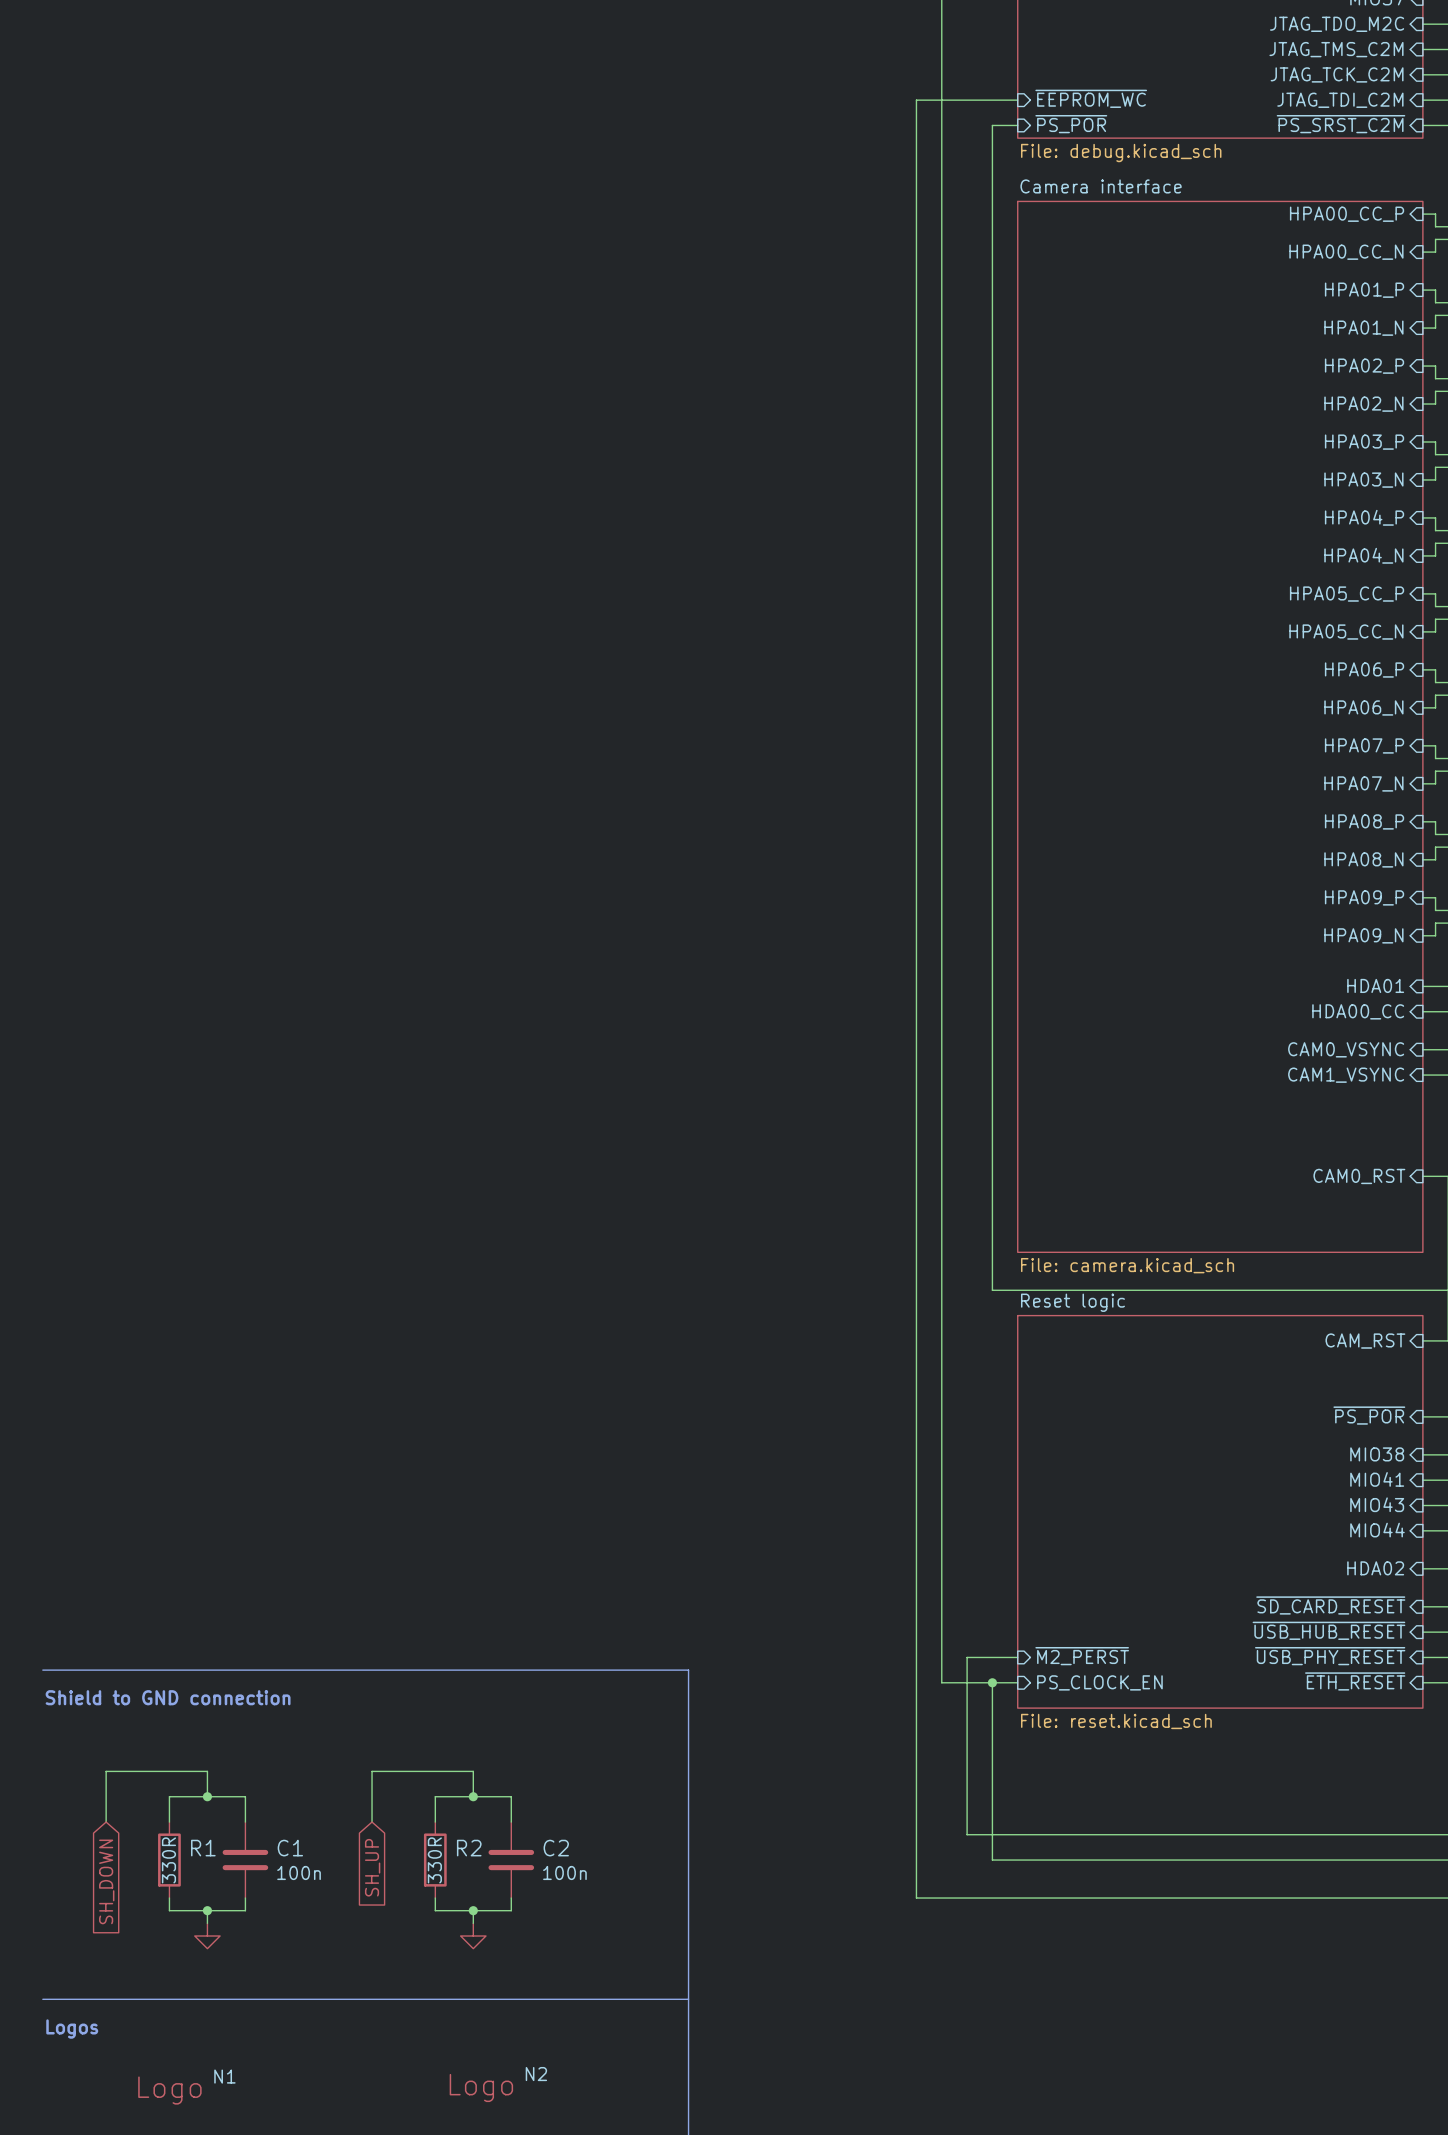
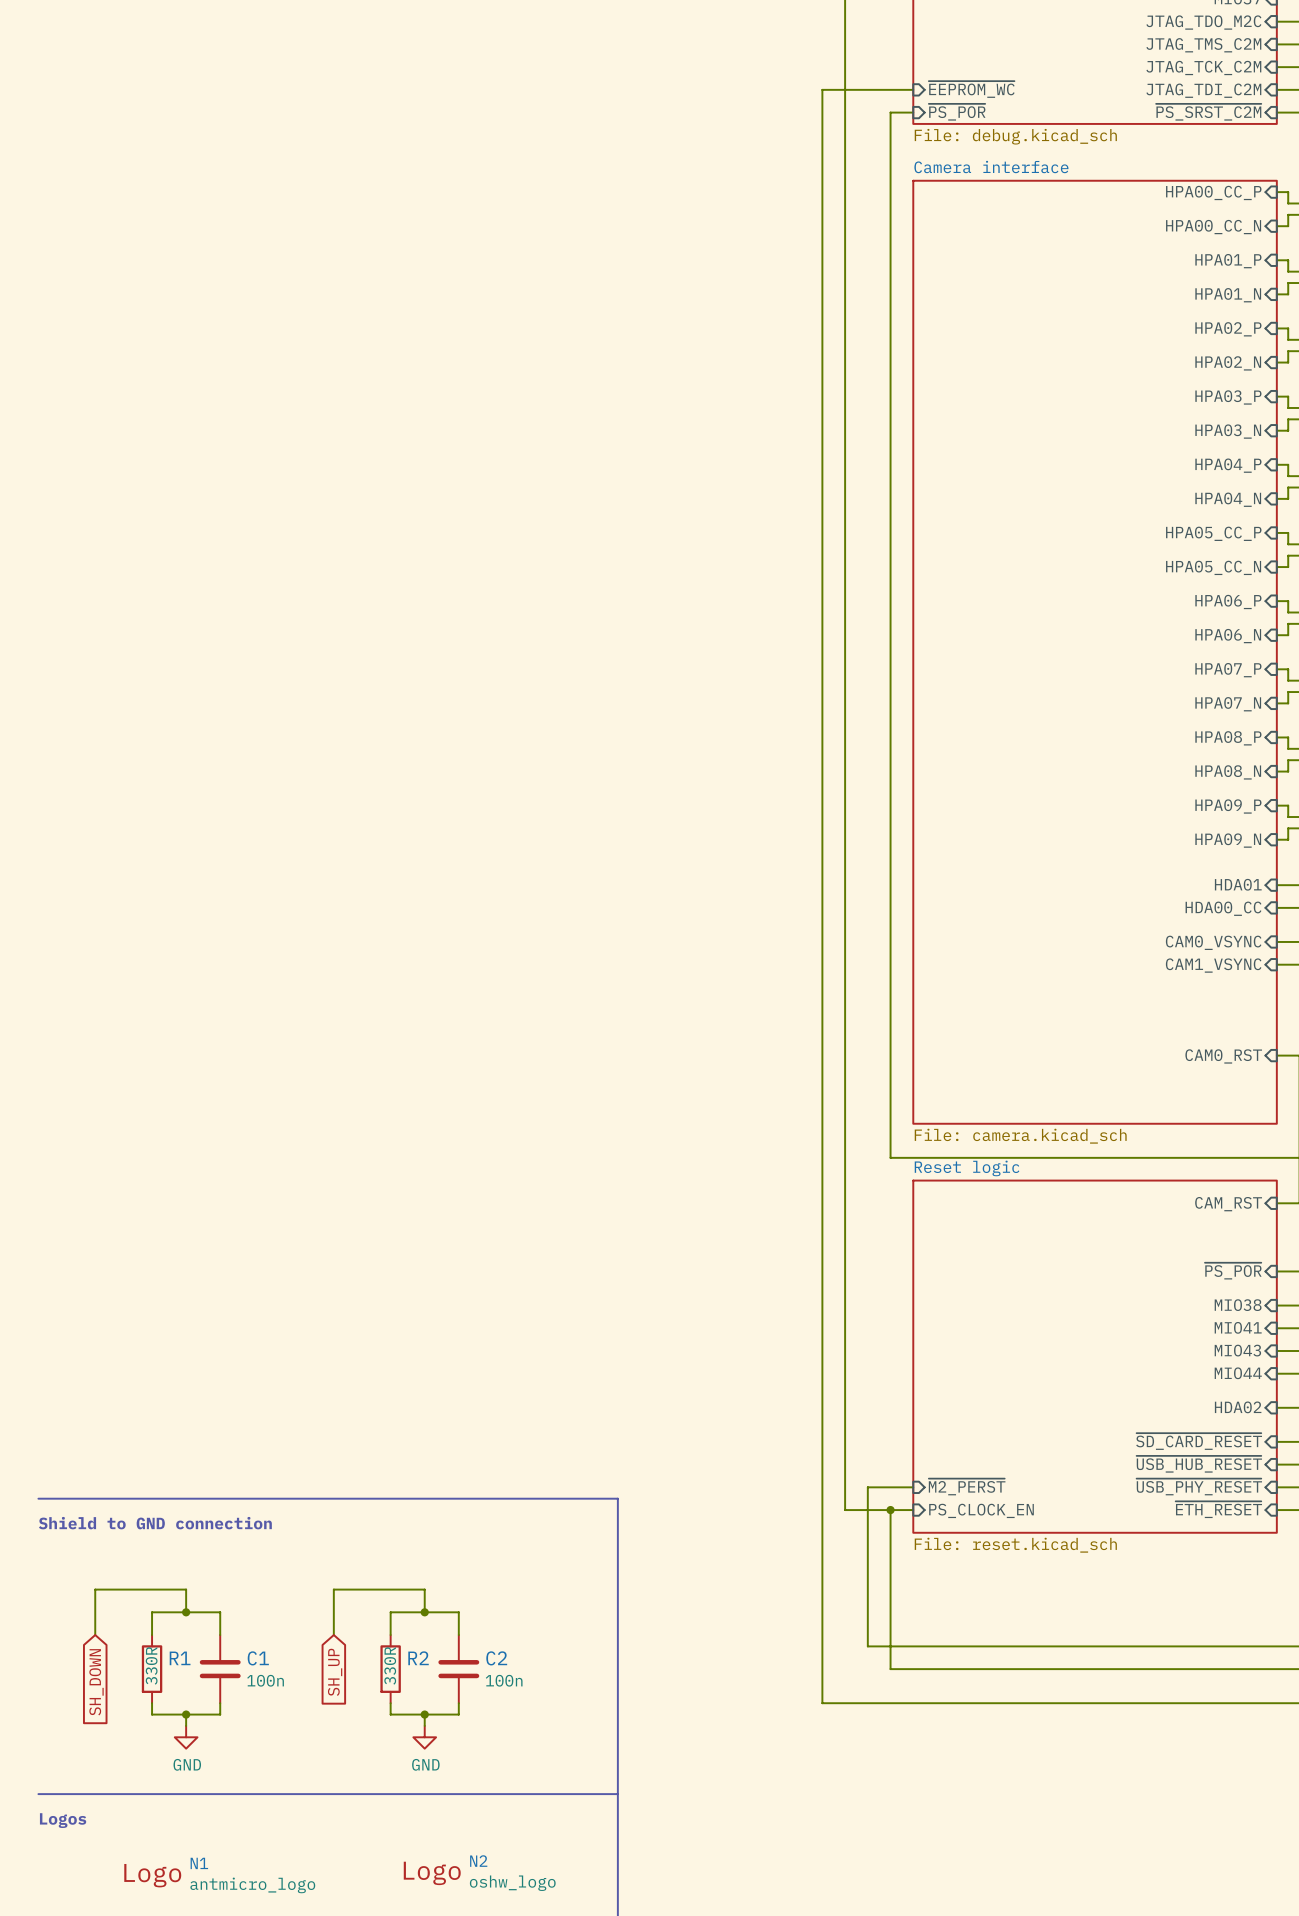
power symbol text: none -> GND (187, 1764)
power symbol text: none -> GND (425, 1764)
N2 value: none -> oshw_logo (512, 1883)
N1 value: none -> antmicro_logo (252, 1885)

